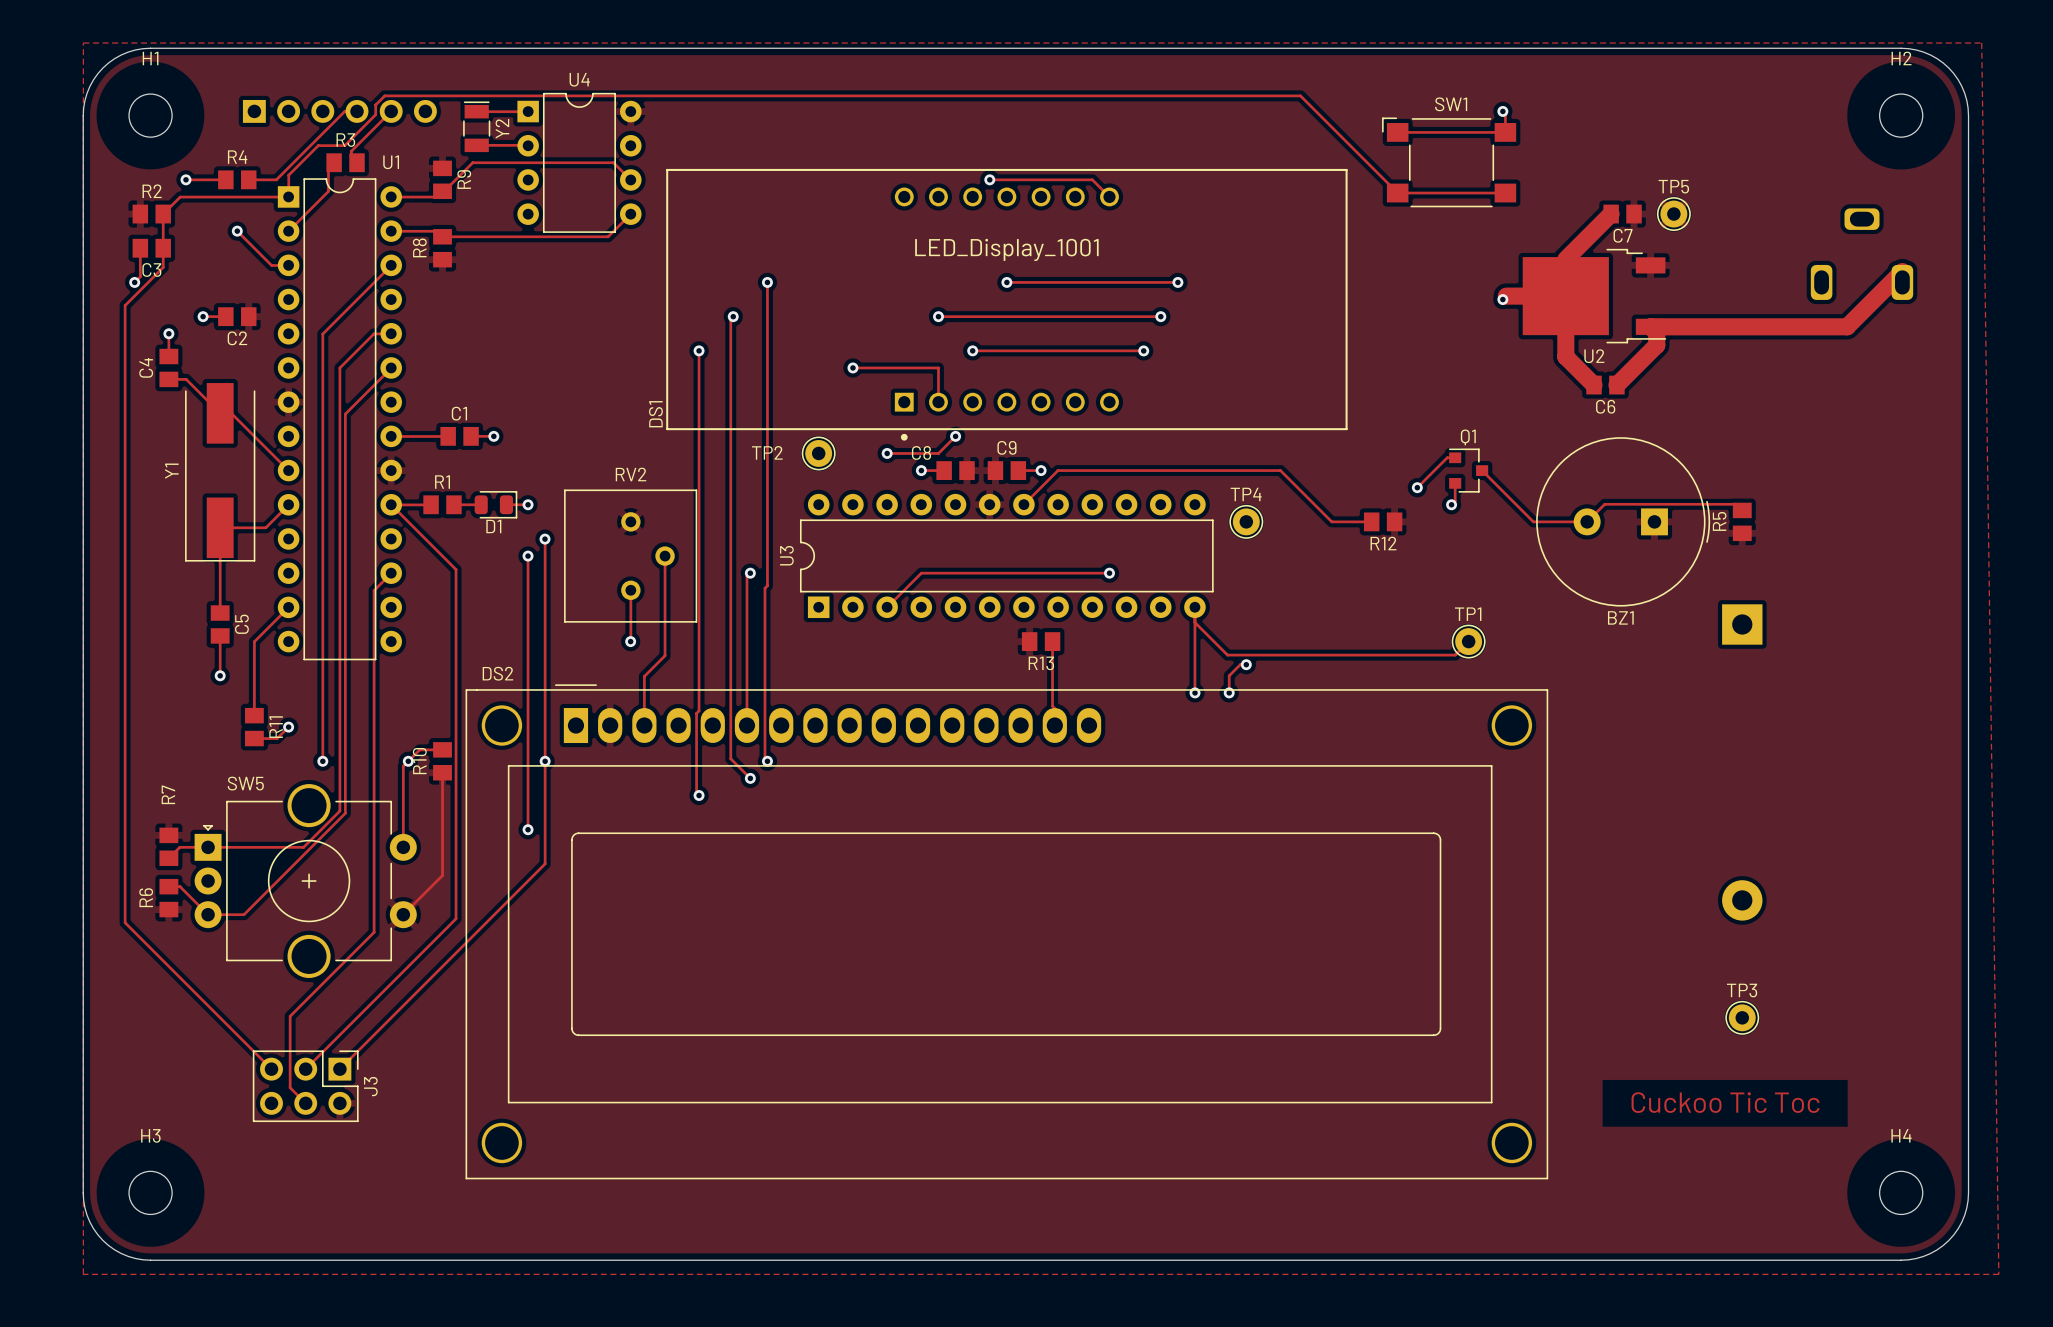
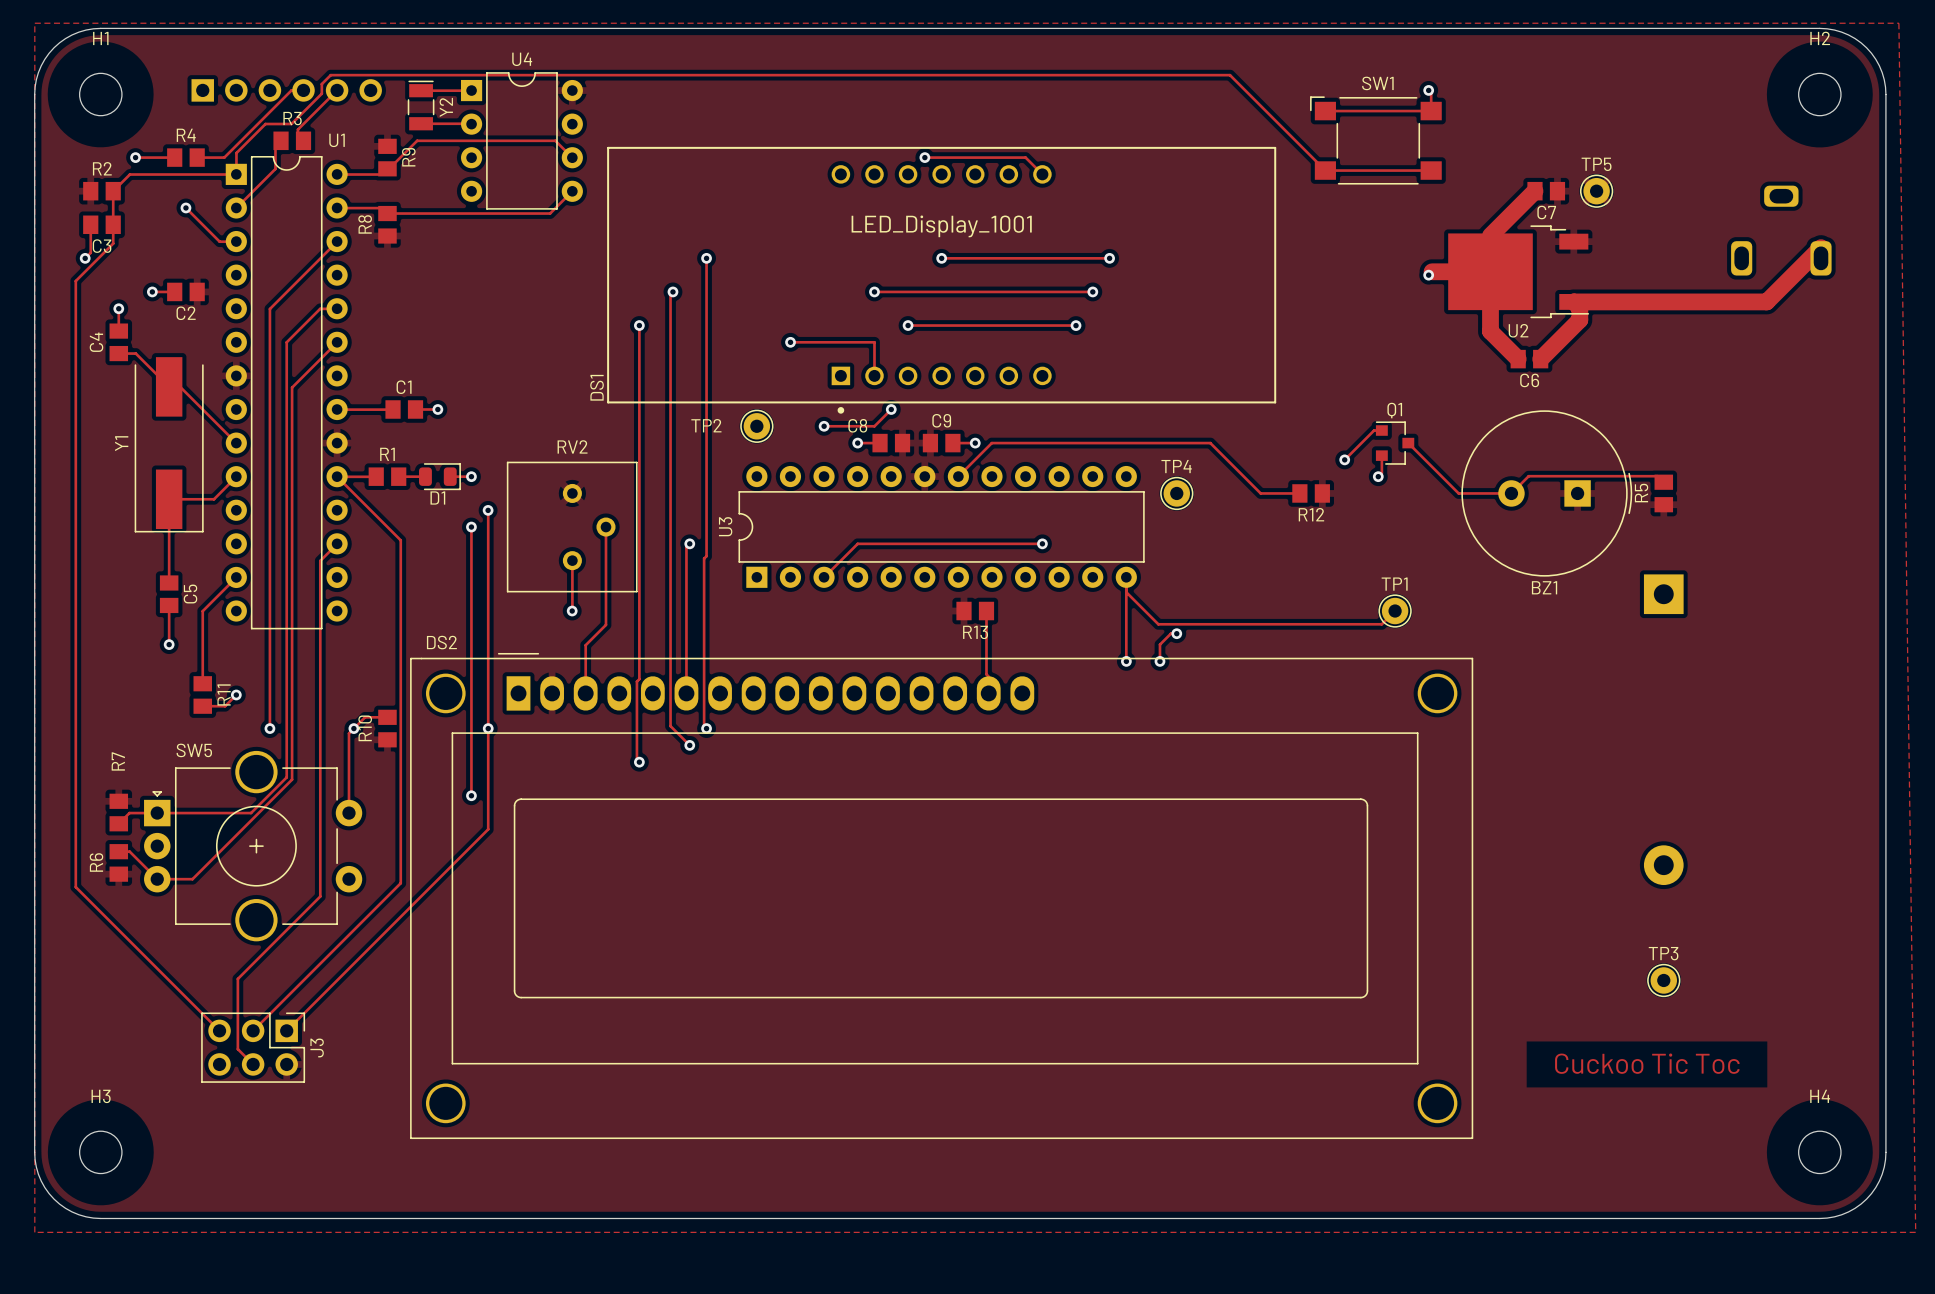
track: (442, 772) (442, 875) (403, 914) -> none

